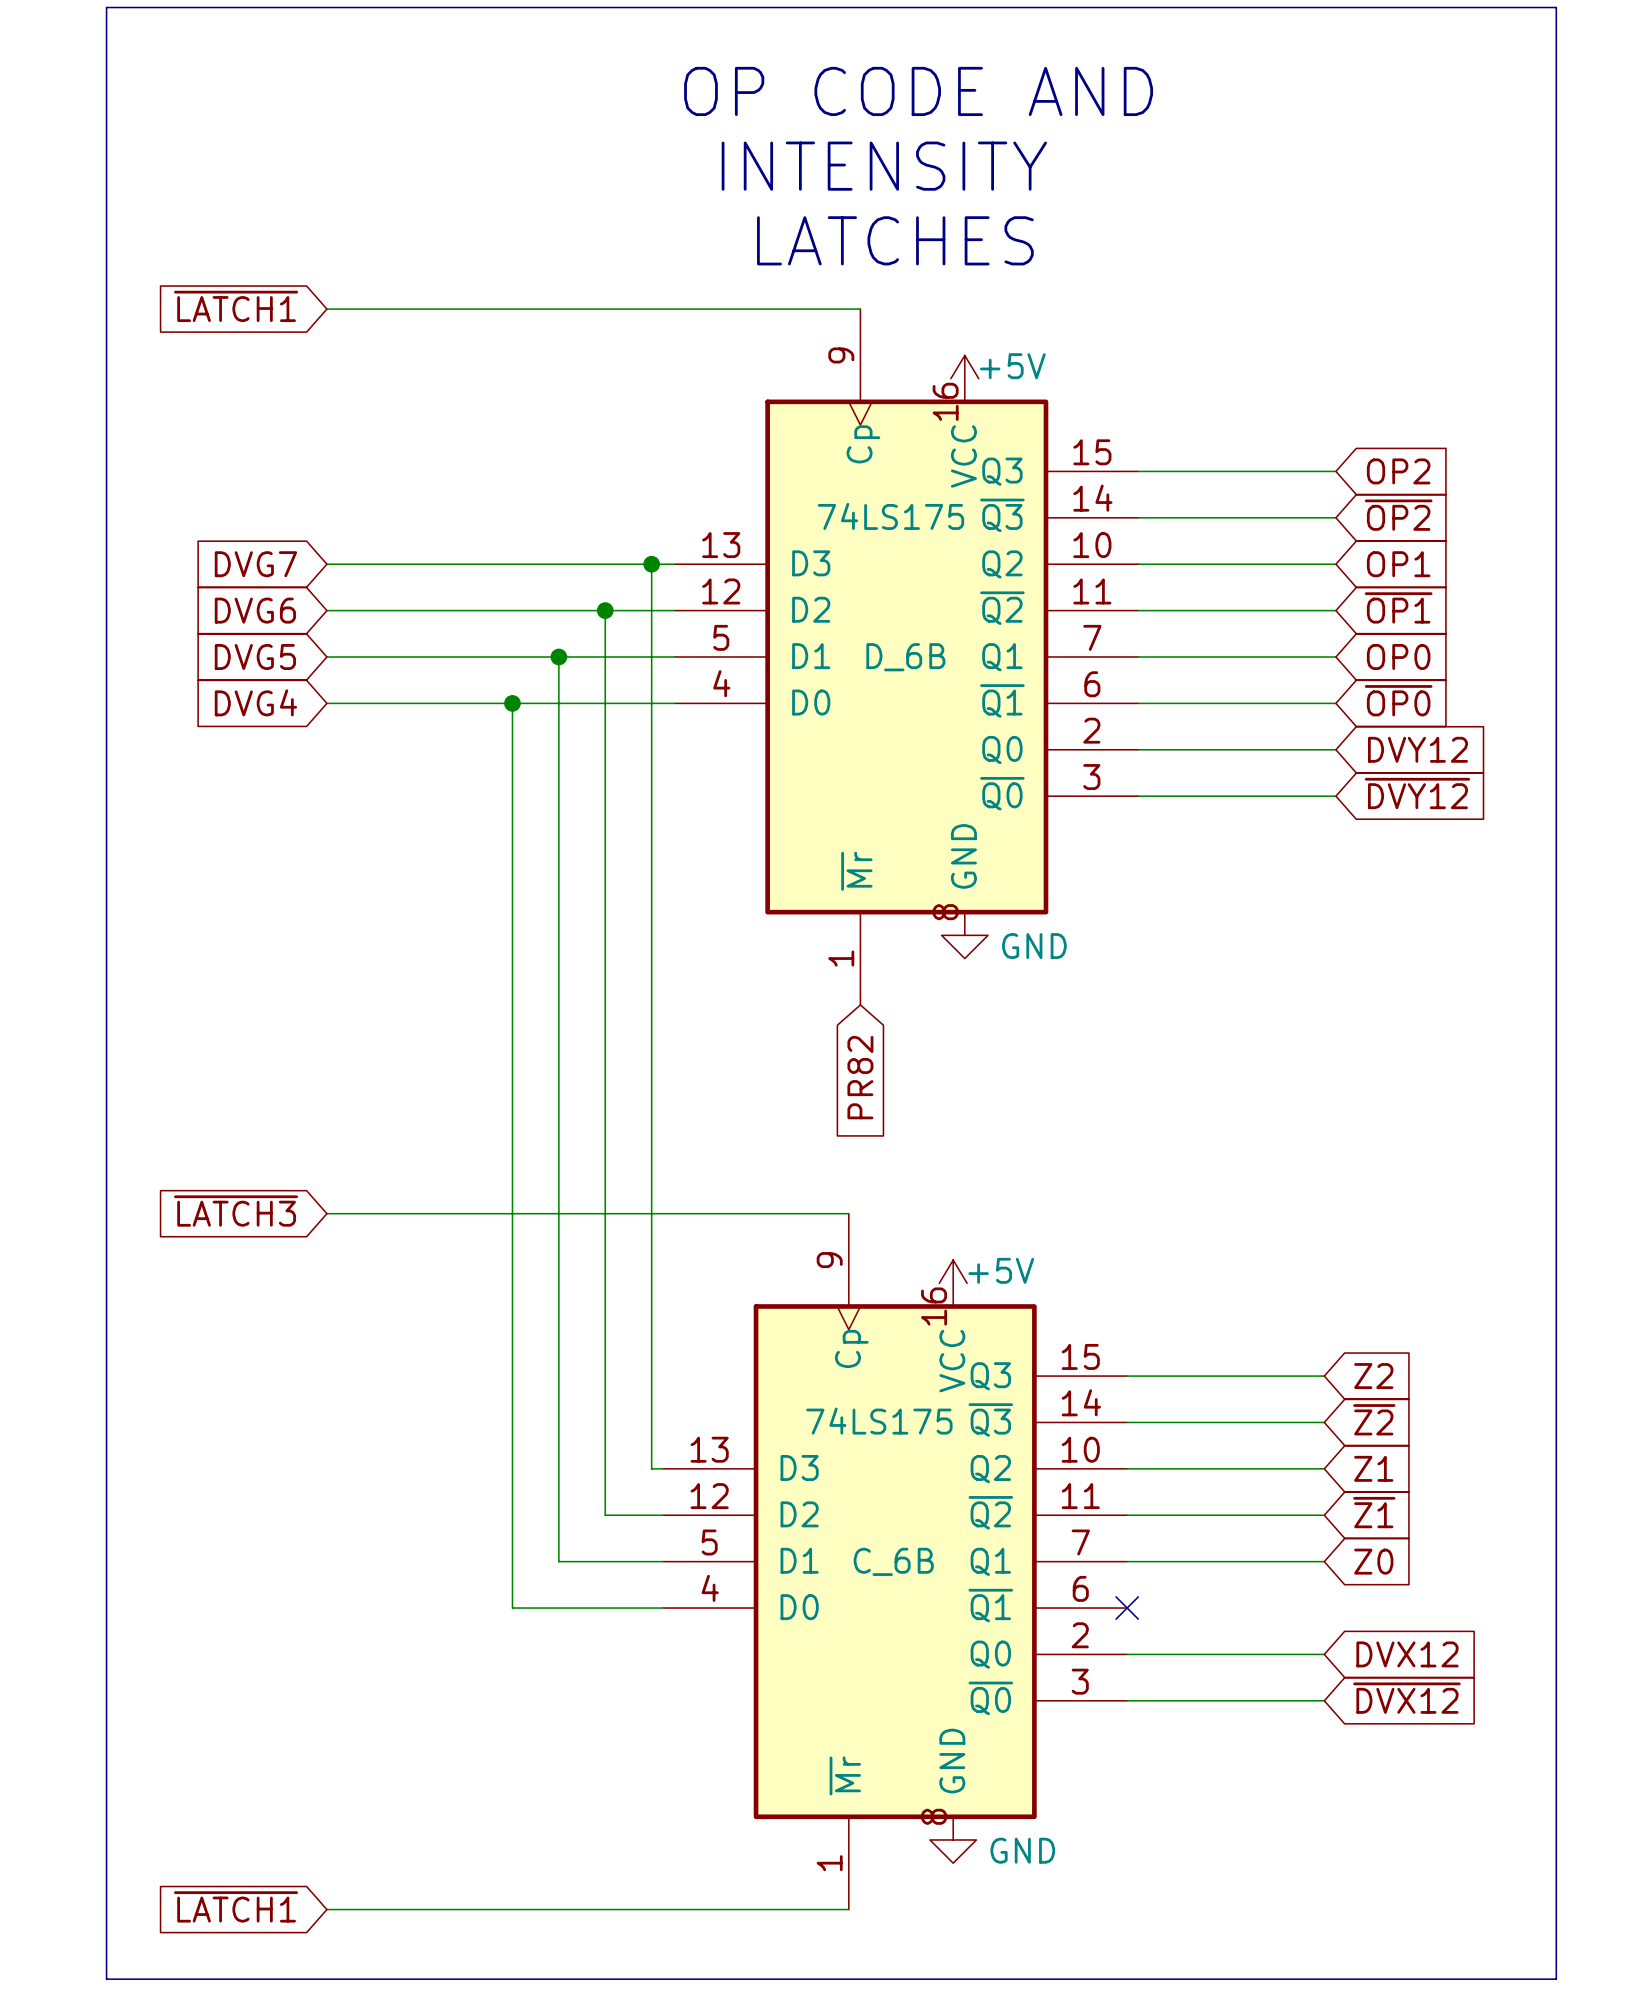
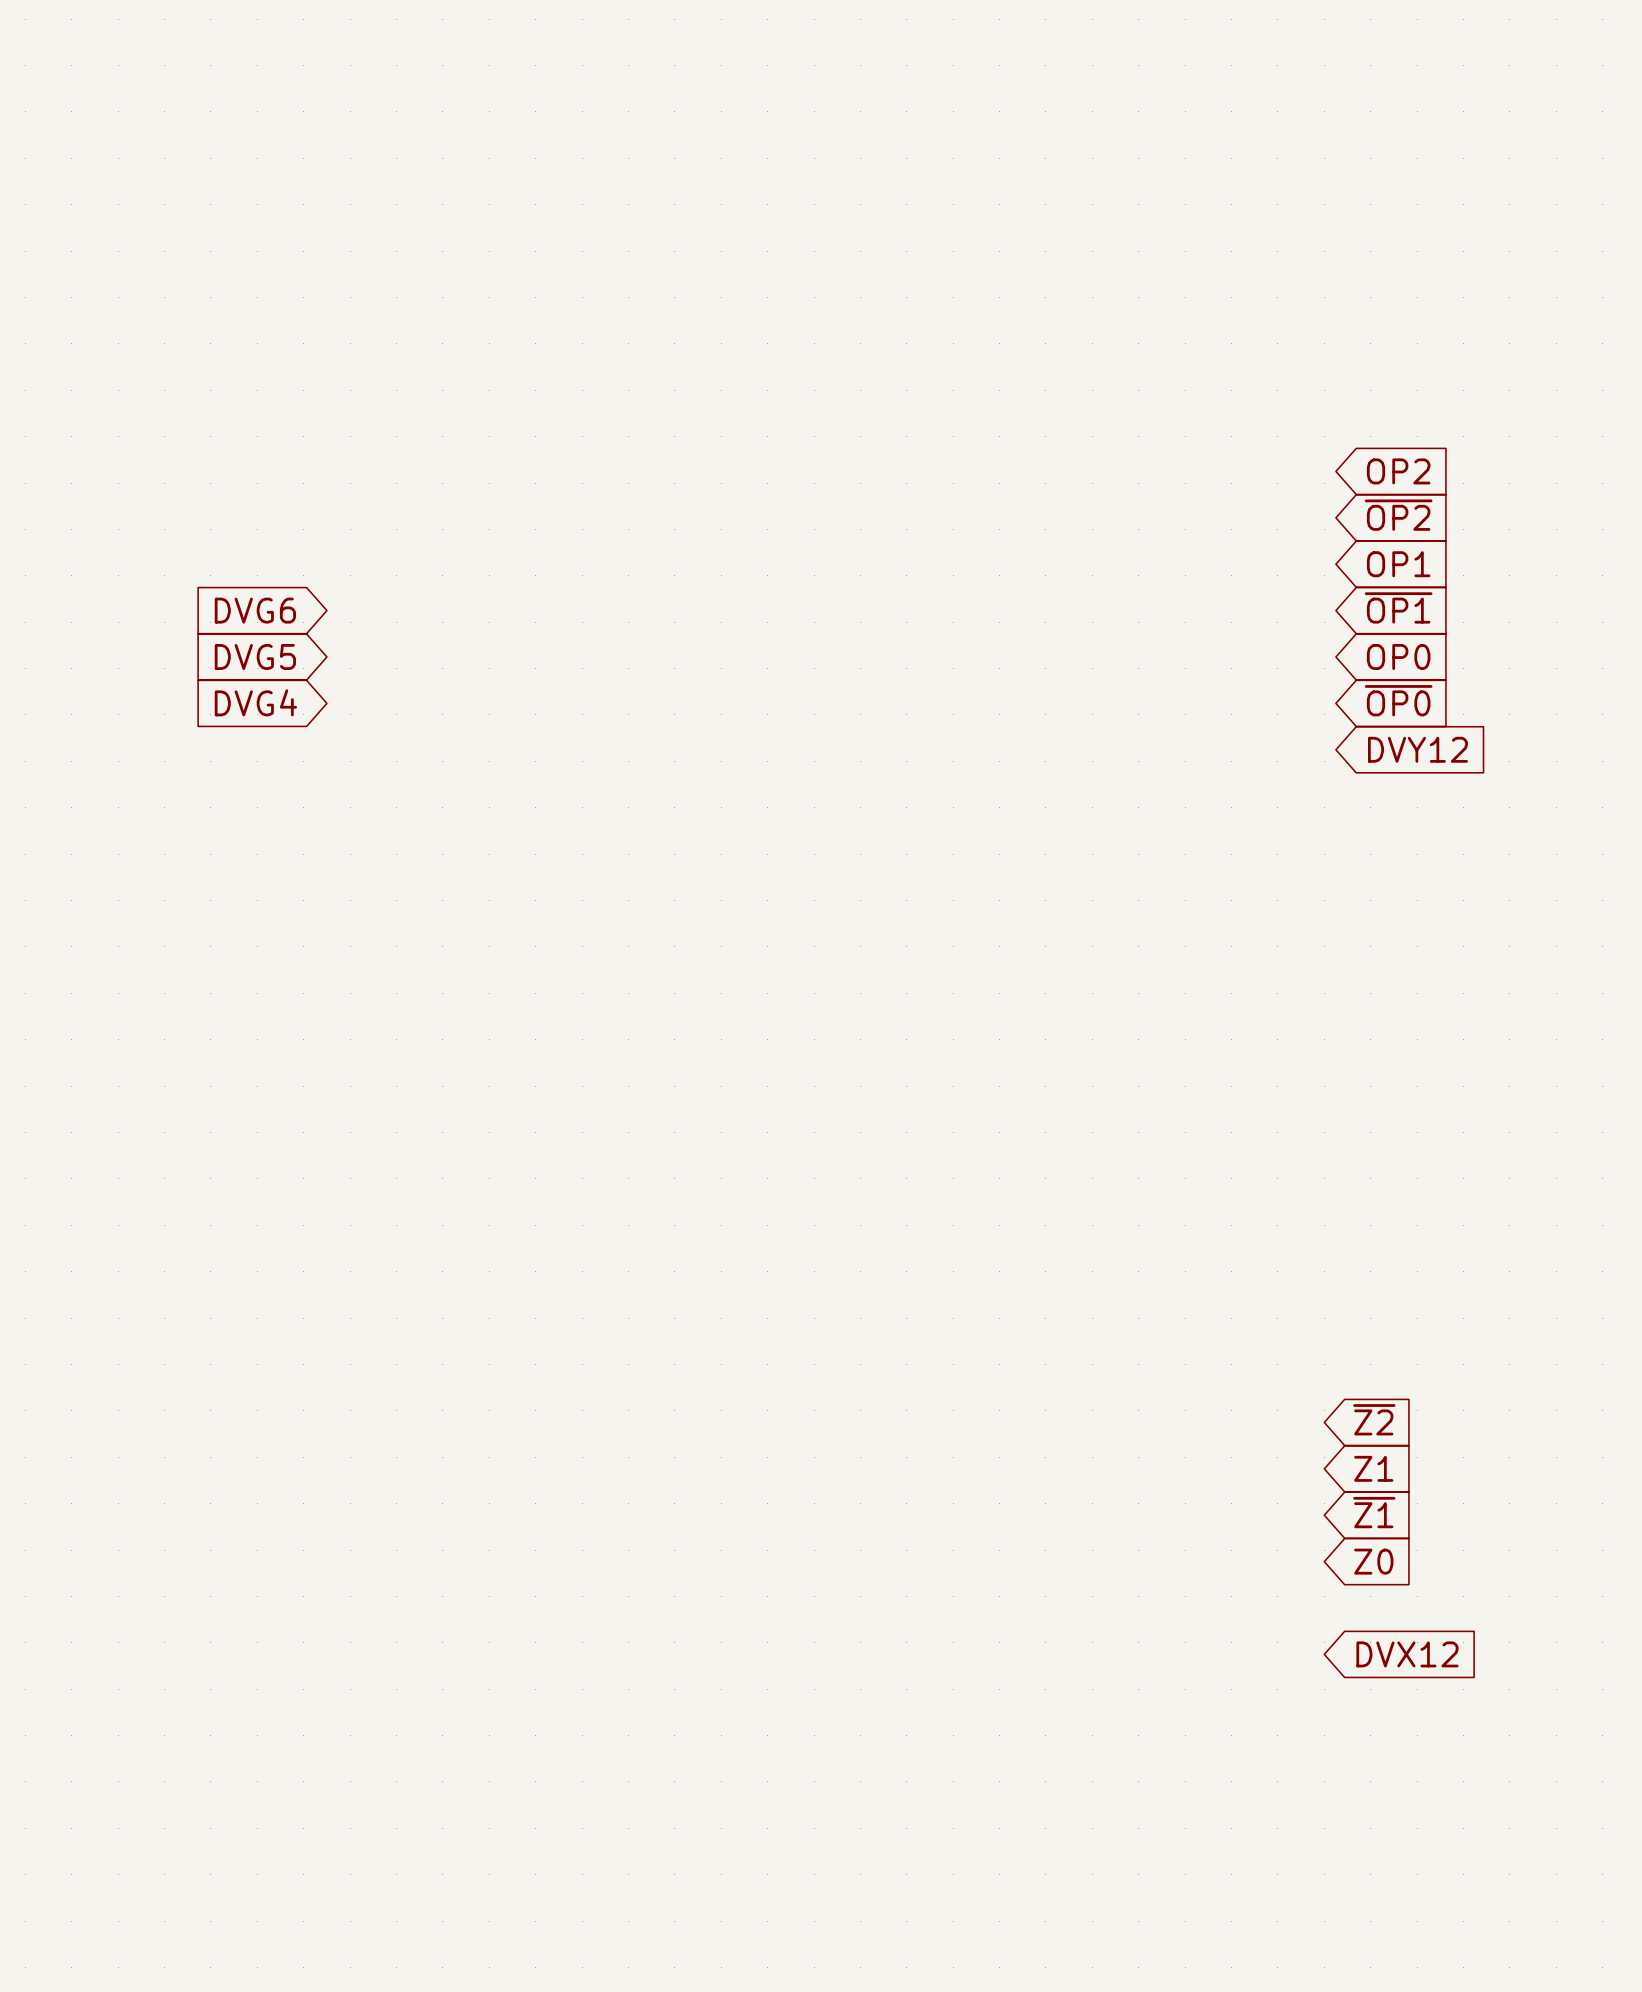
line: (106, 7) (106, 1979) (1556, 1979) (1556, 7) (106, 7) -> none
text: OP CODE AND (918, 91) -> none
text: INTENSITY (884, 166) -> none
text: LATCHES (895, 240) -> none
global label: ~{LATCH1} (236, 306) -> none
wire: (326, 309) (860, 309) -> none
power symbol: +5V (964, 378) -> none
wire: (1138, 471) (1335, 471) -> none
wire: (1138, 517) (1335, 517) -> none
global label: DVG7 (255, 564) -> none
wire: (326, 564) (674, 564) -> none
wire: (651, 564) (651, 1468) (663, 1468) -> none
junction: (651, 564) -> none
wire: (1138, 564) (1335, 564) -> none
wire: (326, 610) (674, 610) -> none
wire: (605, 610) (605, 1515) (663, 1515) -> none
junction: (605, 610) -> none
wire: (1138, 610) (1335, 610) -> none
wire: (326, 657) (674, 657) -> none
wire: (558, 657) (558, 1561) (663, 1561) -> none
junction: (558, 657) -> none
D_6B: 74LS175 (906, 657) -> none
wire: (1138, 657) (1335, 657) -> none
wire: (326, 703) (674, 703) -> none
wire: (512, 703) (512, 1608) (663, 1608) -> none
junction: (512, 703) -> none
wire: (1138, 703) (1335, 703) -> none
wire: (1138, 749) (1335, 749) -> none
global label: ~{DVY12} (1417, 793) -> none
wire: (1138, 796) (1335, 796) -> none
power symbol: GND (964, 935) -> none
global label: PR82 (860, 1077) -> none
global label: ~{LATCH3} (236, 1211) -> none
wire: (326, 1213) (848, 1213) -> none
power symbol: +5V (953, 1283) -> none
wire: (1127, 1376) (1324, 1376) -> none
global label: Z2 (1373, 1376) -> none
wire: (1127, 1422) (1324, 1422) -> none
wire: (1127, 1468) (1324, 1468) -> none
wire: (1127, 1515) (1324, 1515) -> none
C_6B: 74LS175 (895, 1561) -> none
wire: (1127, 1561) (1324, 1561) -> none
no-connect mark: (1127, 1608) -> none
wire: (1127, 1654) (1324, 1654) -> none
global label: ~{DVX12} (1406, 1698) -> none
wire: (1127, 1700) (1324, 1700) -> none
power symbol: GND (953, 1839) -> none
global label: ~{LATCH1} (236, 1906) -> none
wire: (326, 1909) (848, 1909) -> none

